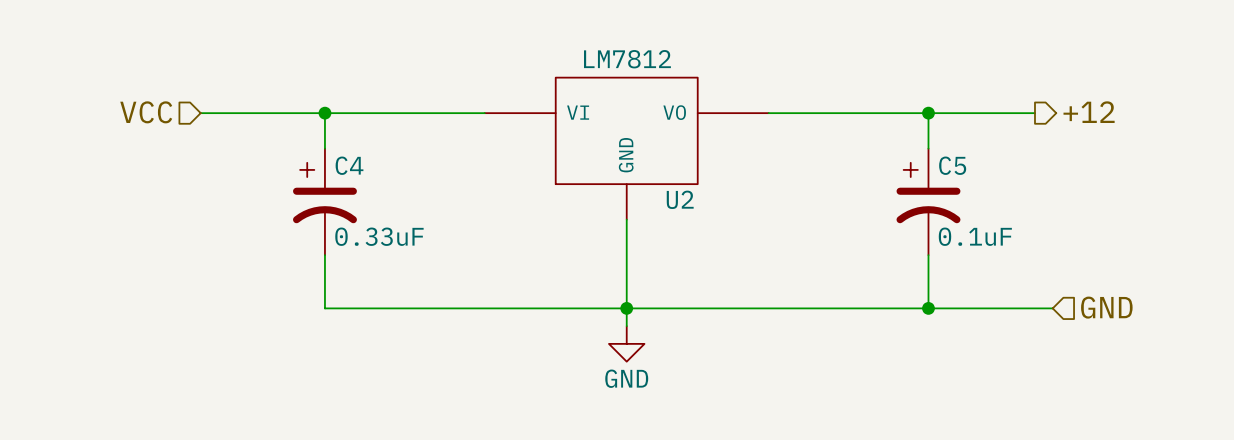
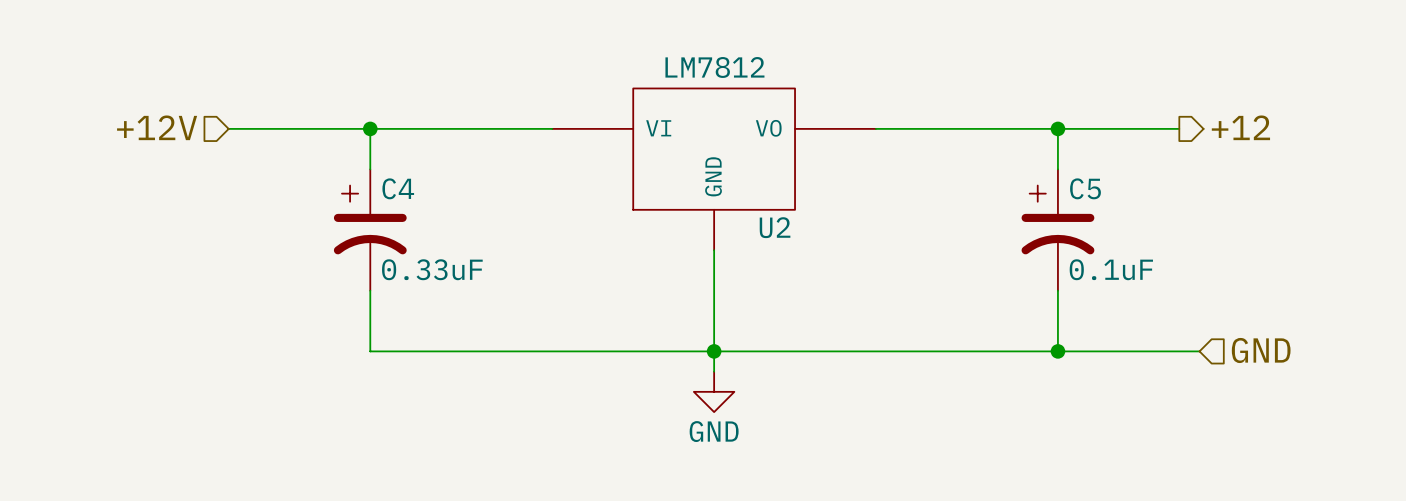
hierarchical label: VCC (146, 112) -> +12V (157, 127)

